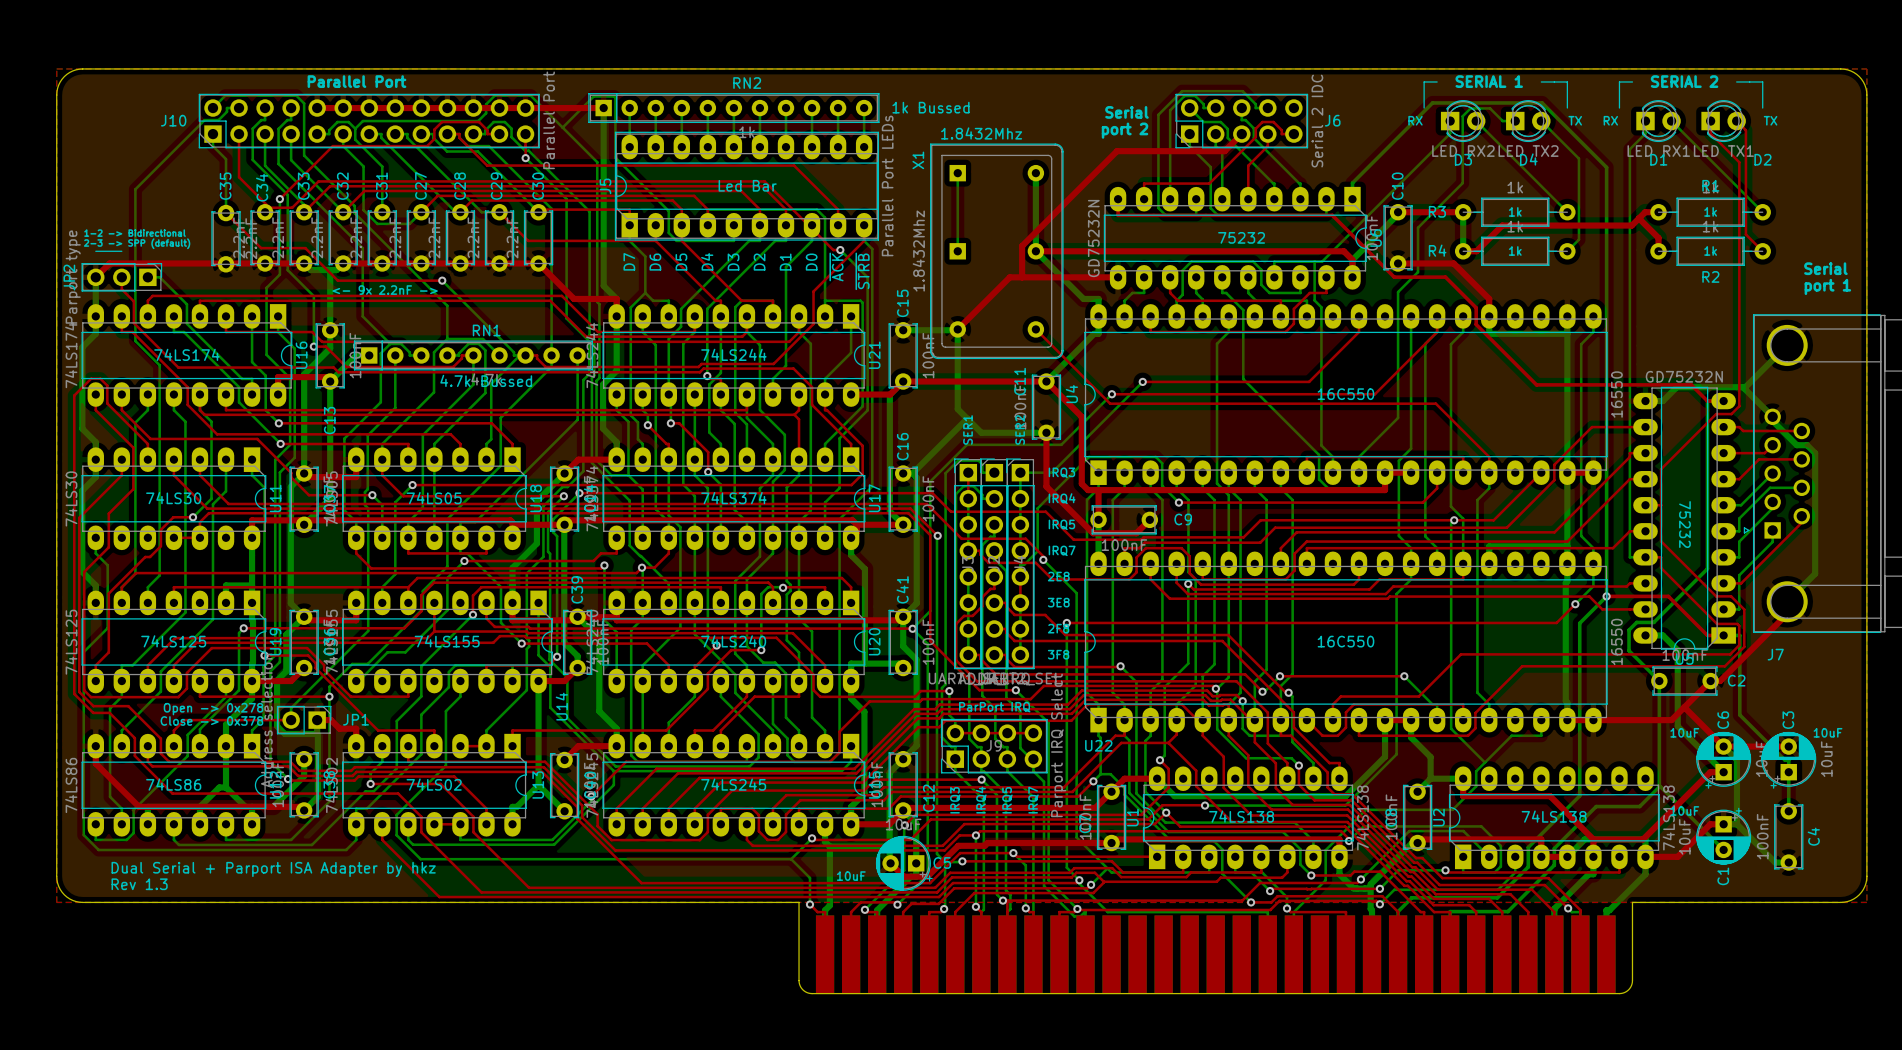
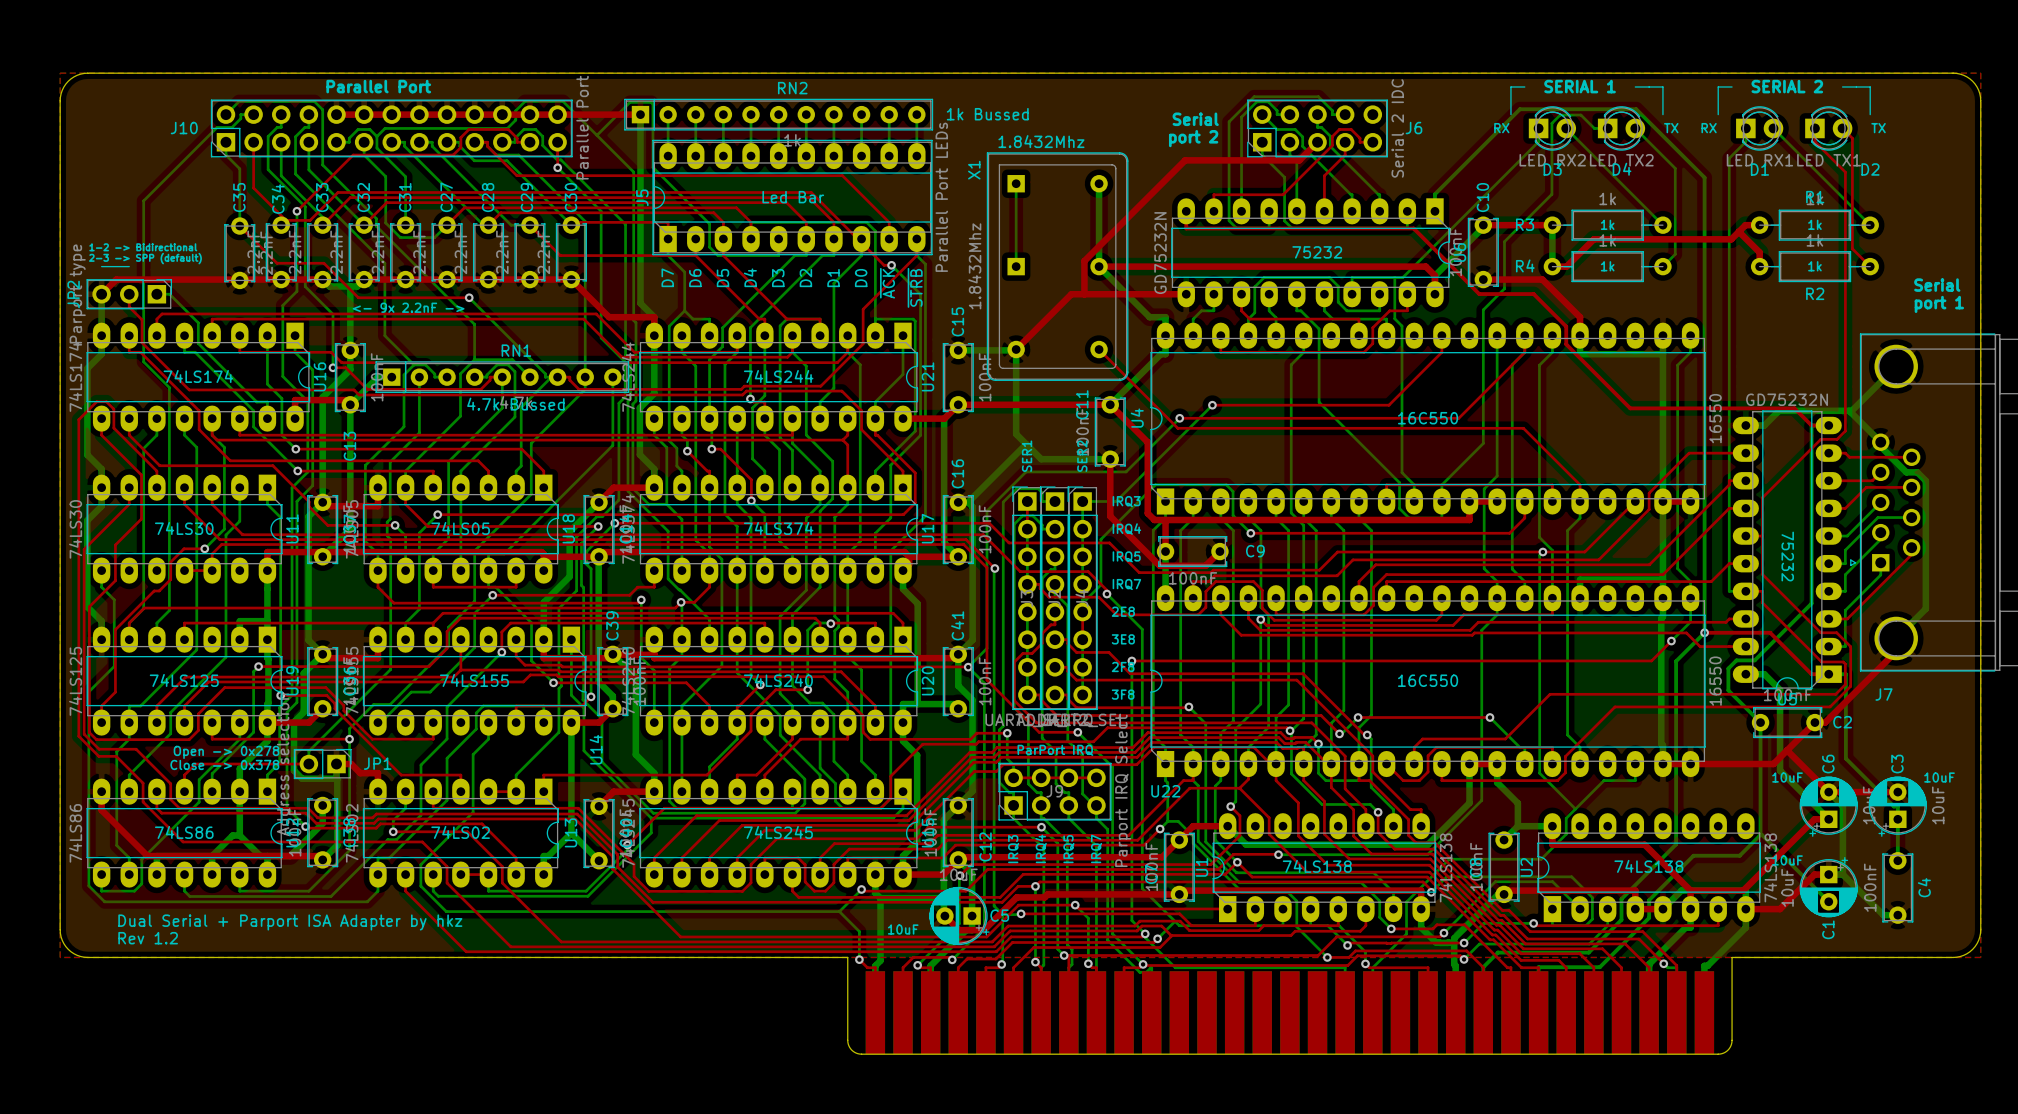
text: Rev 1.3 (139, 884) -> Rev 1.2 (148, 938)

